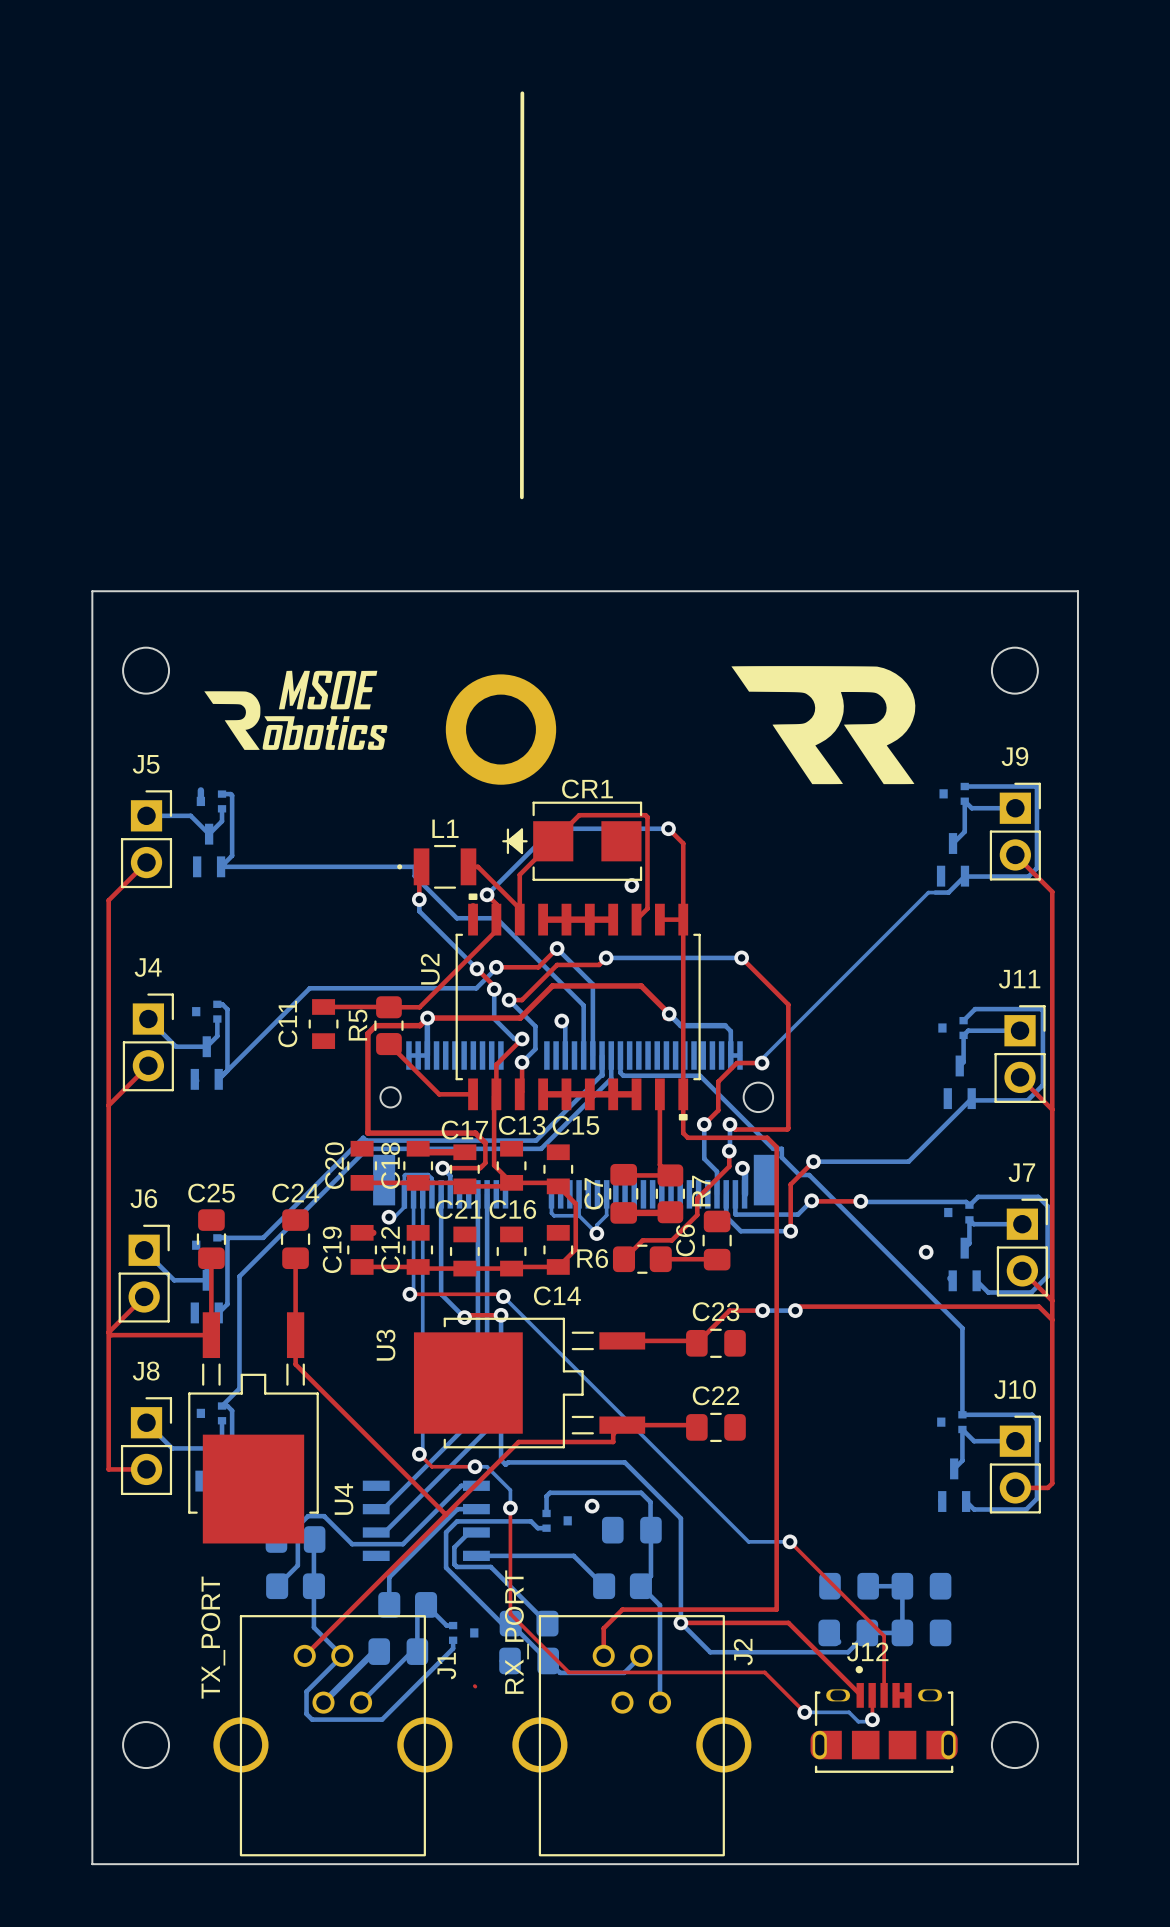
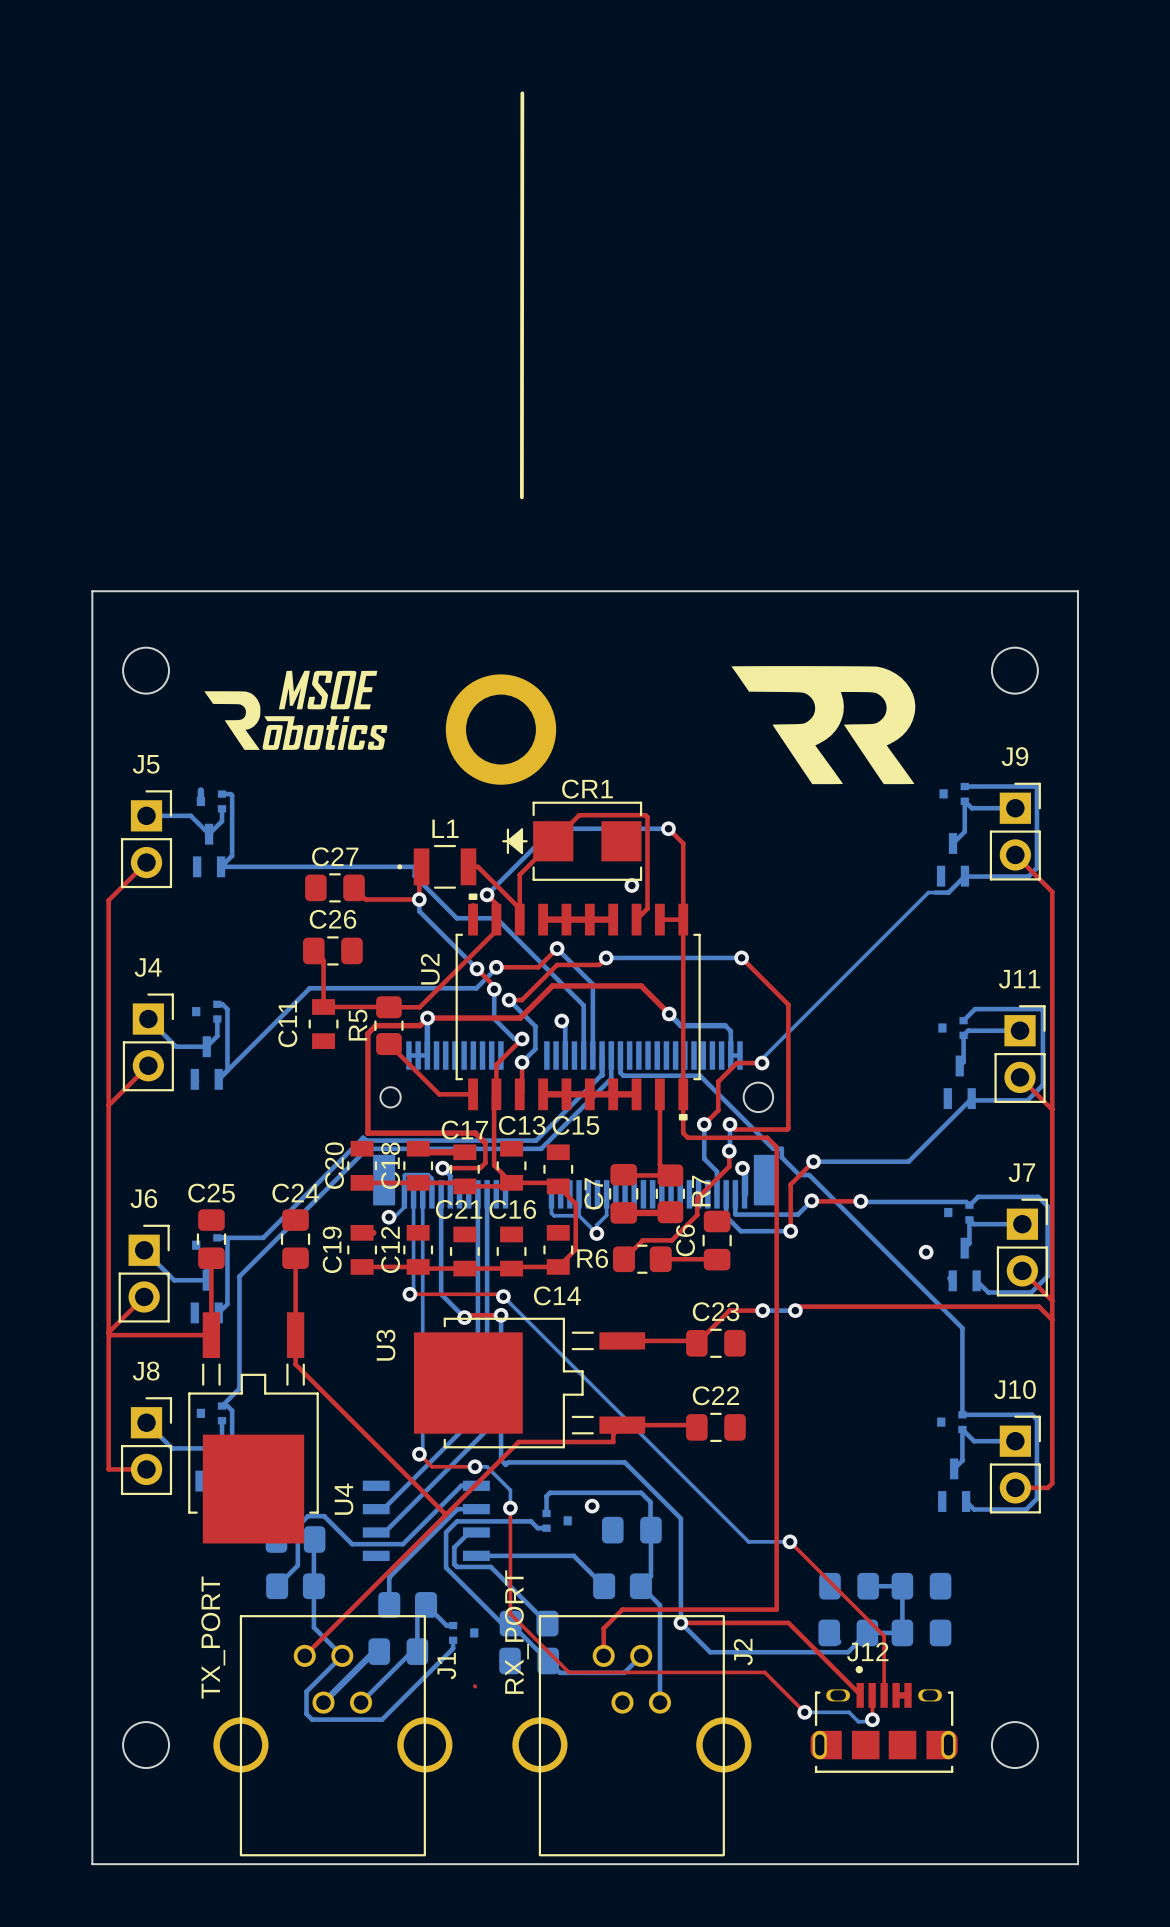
C27: none -> (334, 887)
top track: none -> (354, 887) (365, 899) (419, 899)
top track: none -> (313, 950) (323, 960) (323, 1006)
C26: none -> (332, 950)

